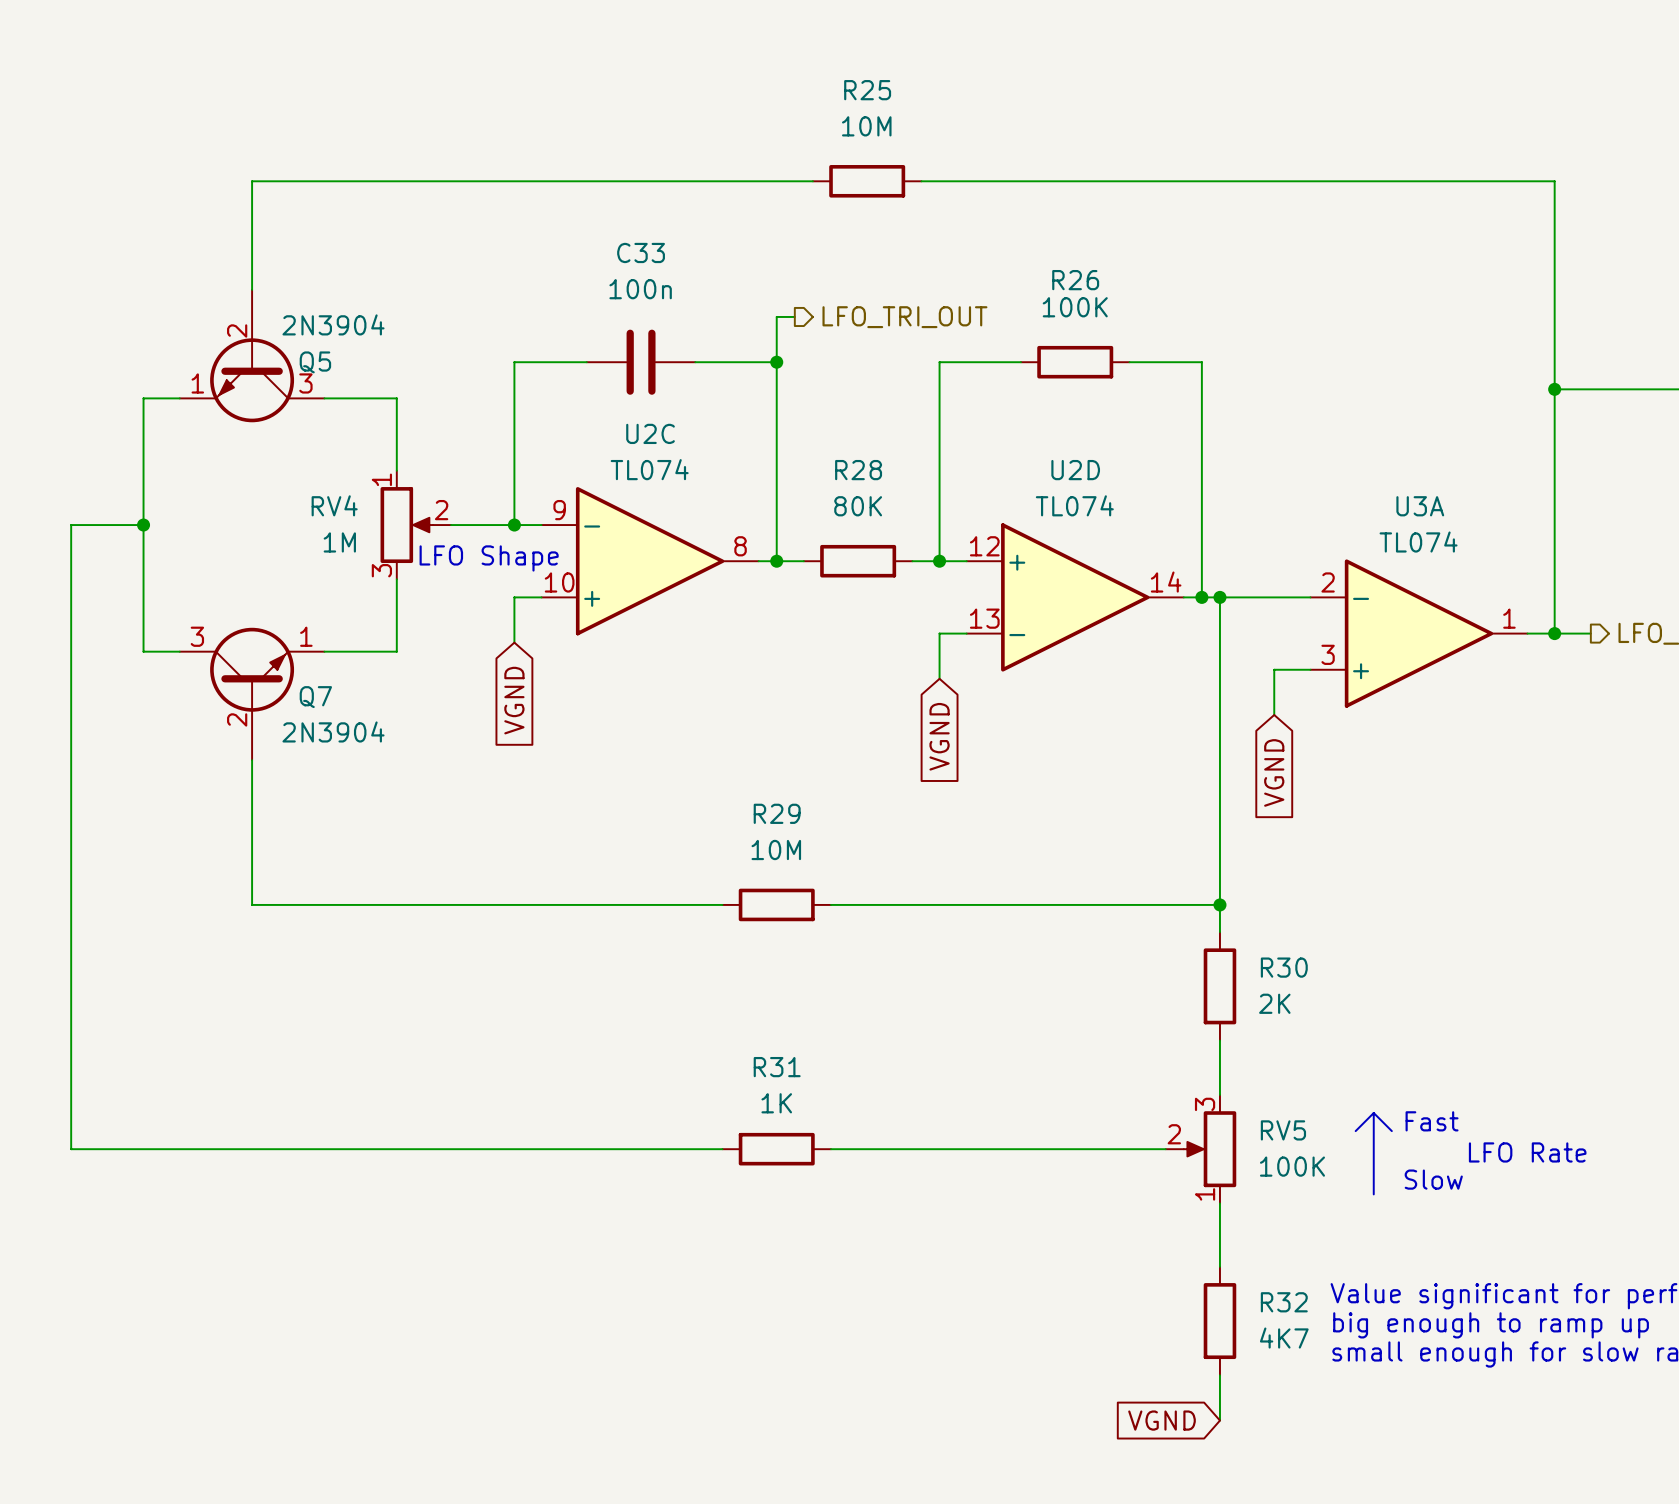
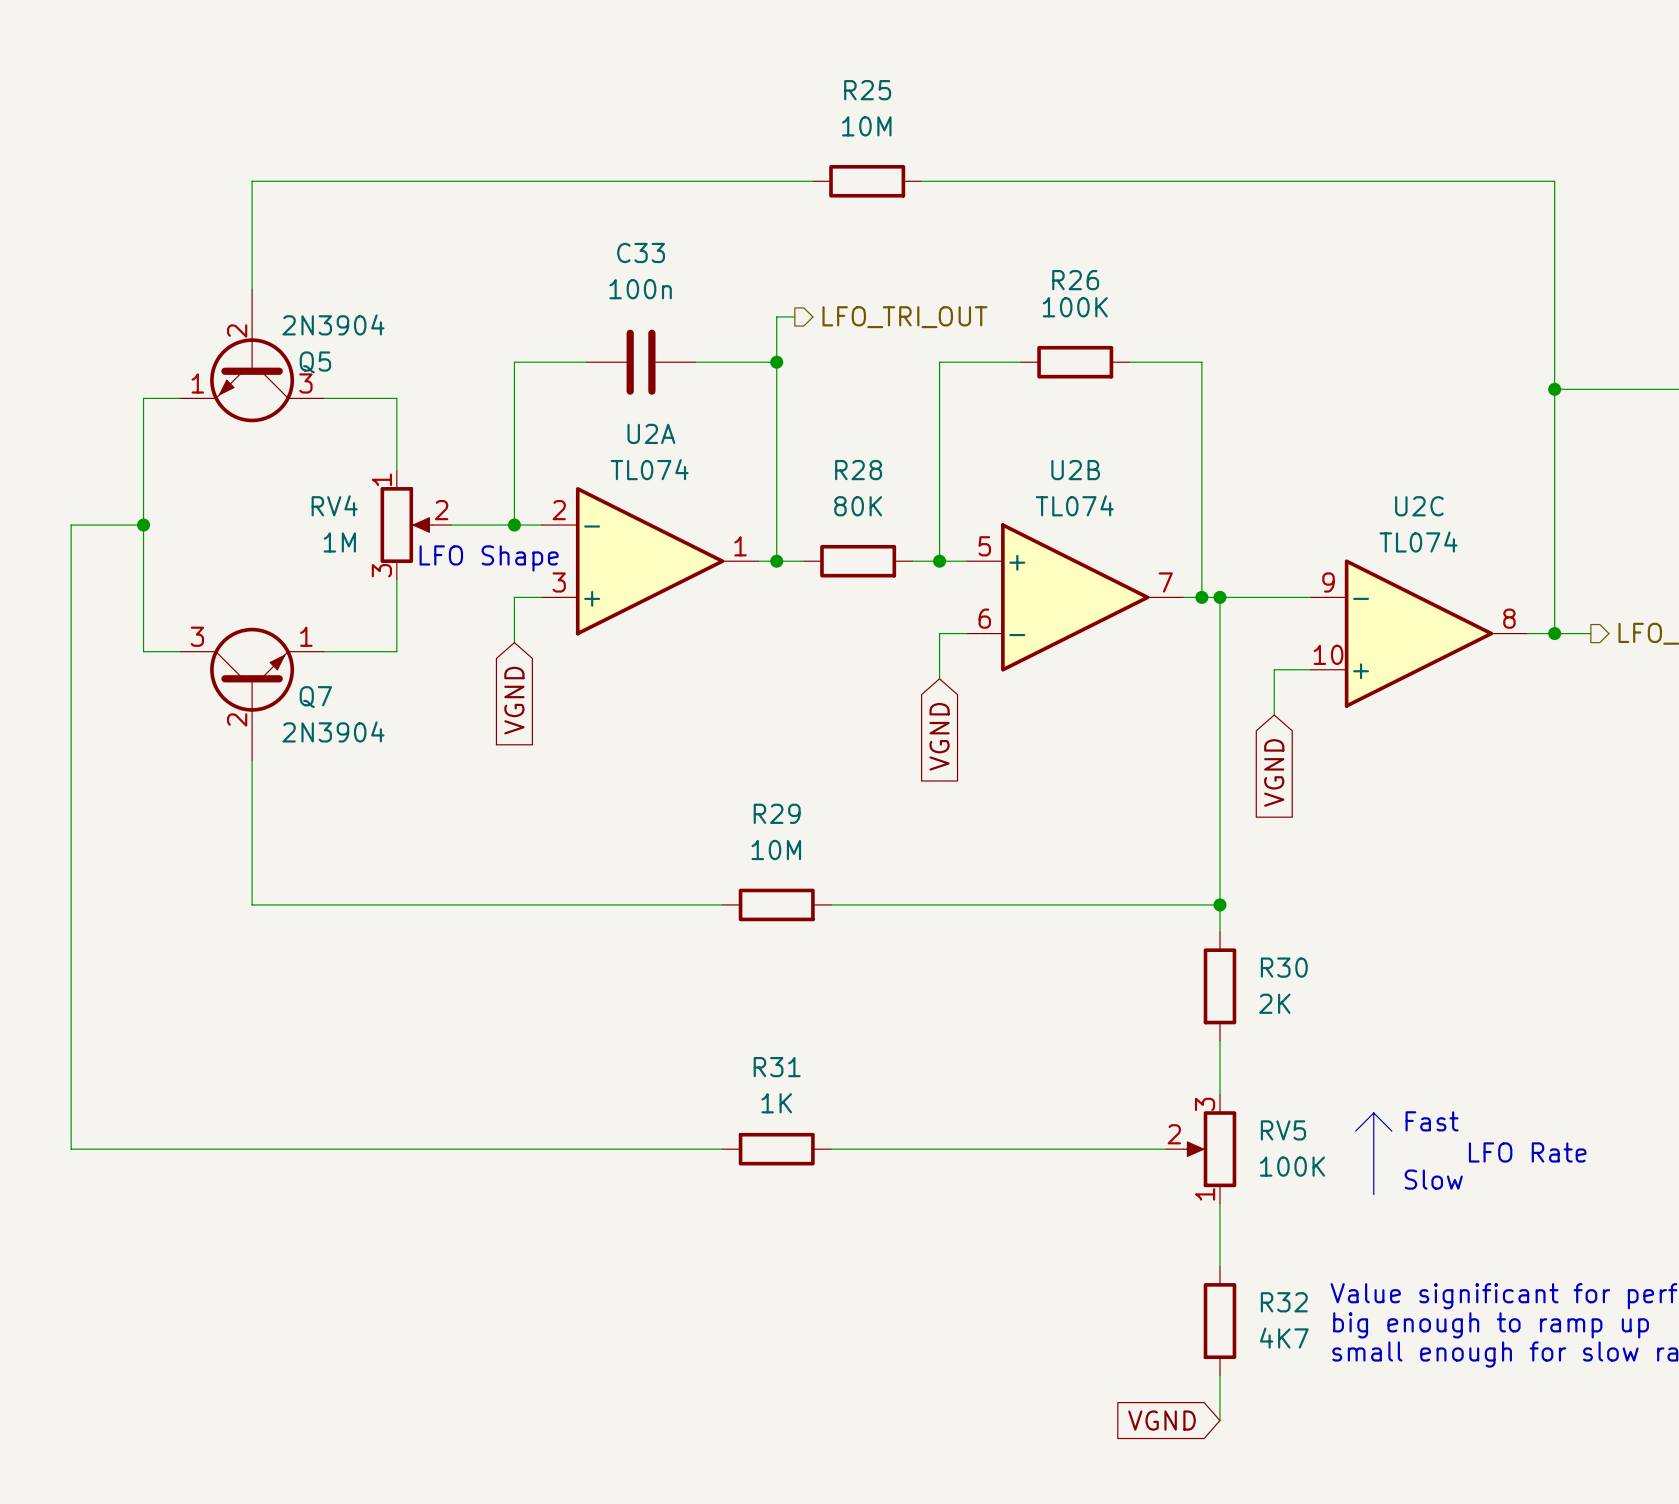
U2D name: U2D (1075, 470) -> U2B (1075, 470)
U2D pin number: 12 (984, 546) -> 5 (984, 546)
U2C position: (650, 561) -> (1418, 633)
U2A: none -> TL074 (650, 561)
U2D pin number: 14 (1166, 582) -> 7 (1165, 582)
U2D pin number: 13 (984, 618) -> 6 (984, 618)
U3A: TL074 (1418, 633) -> none

